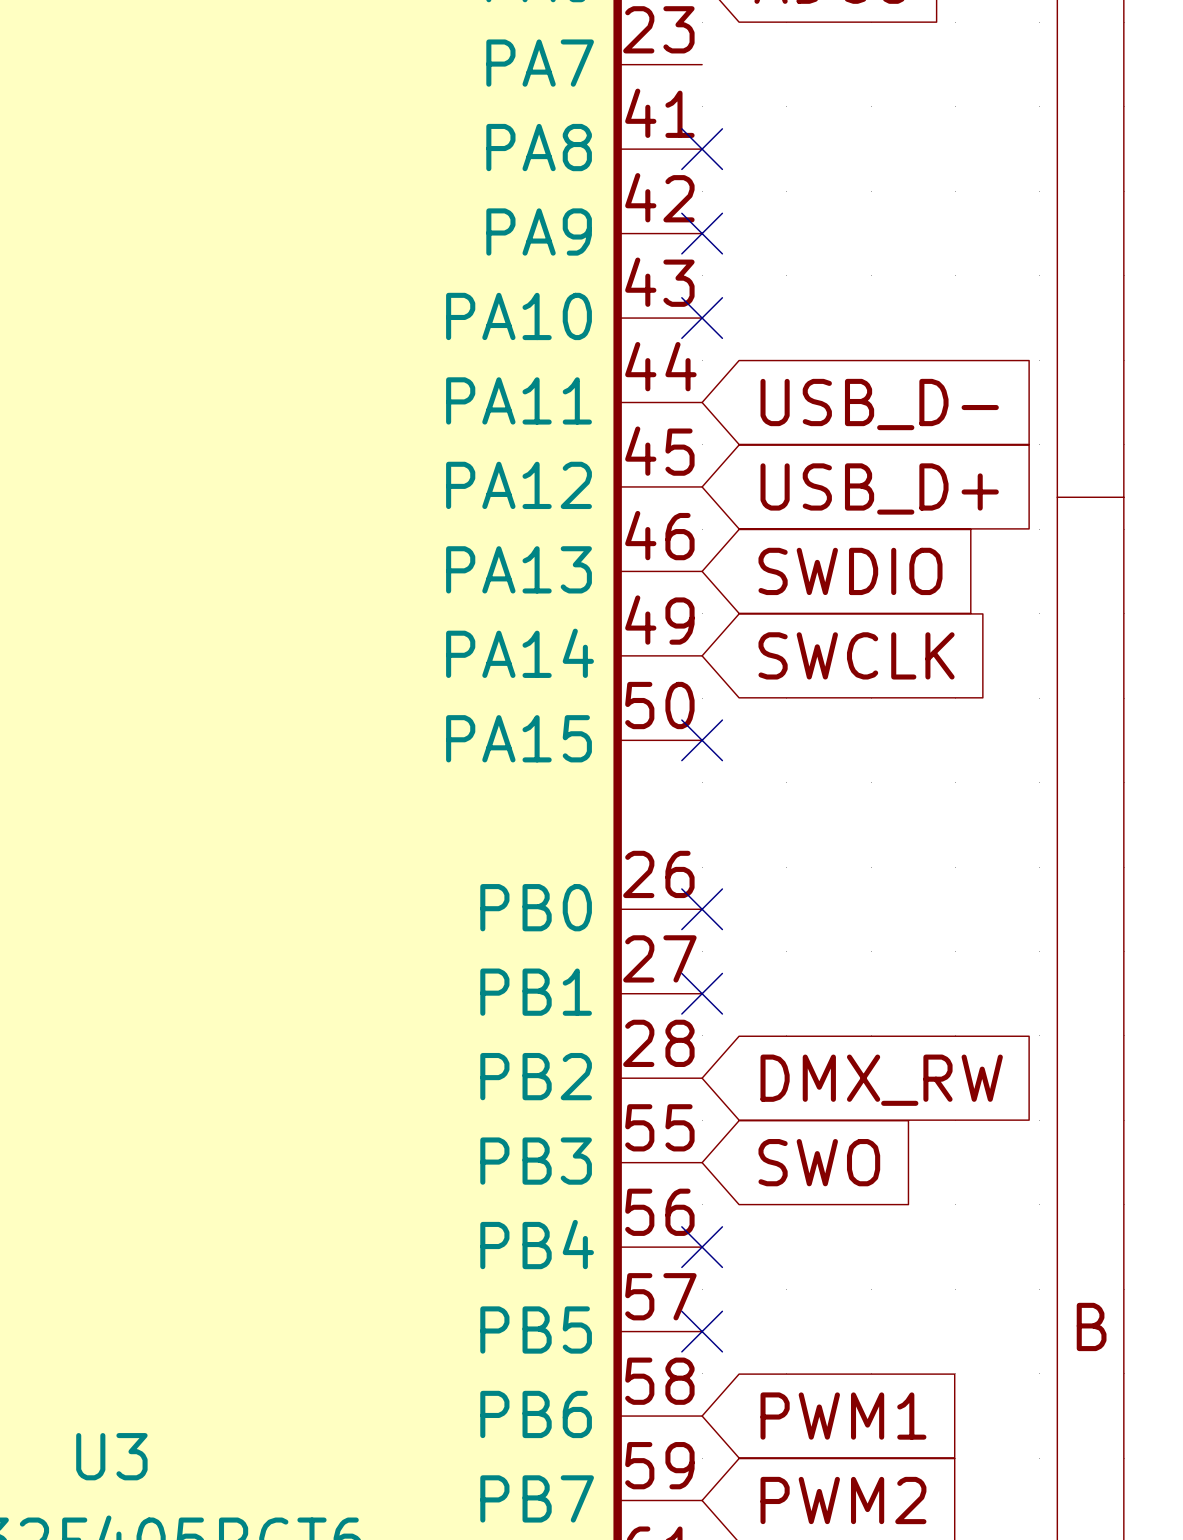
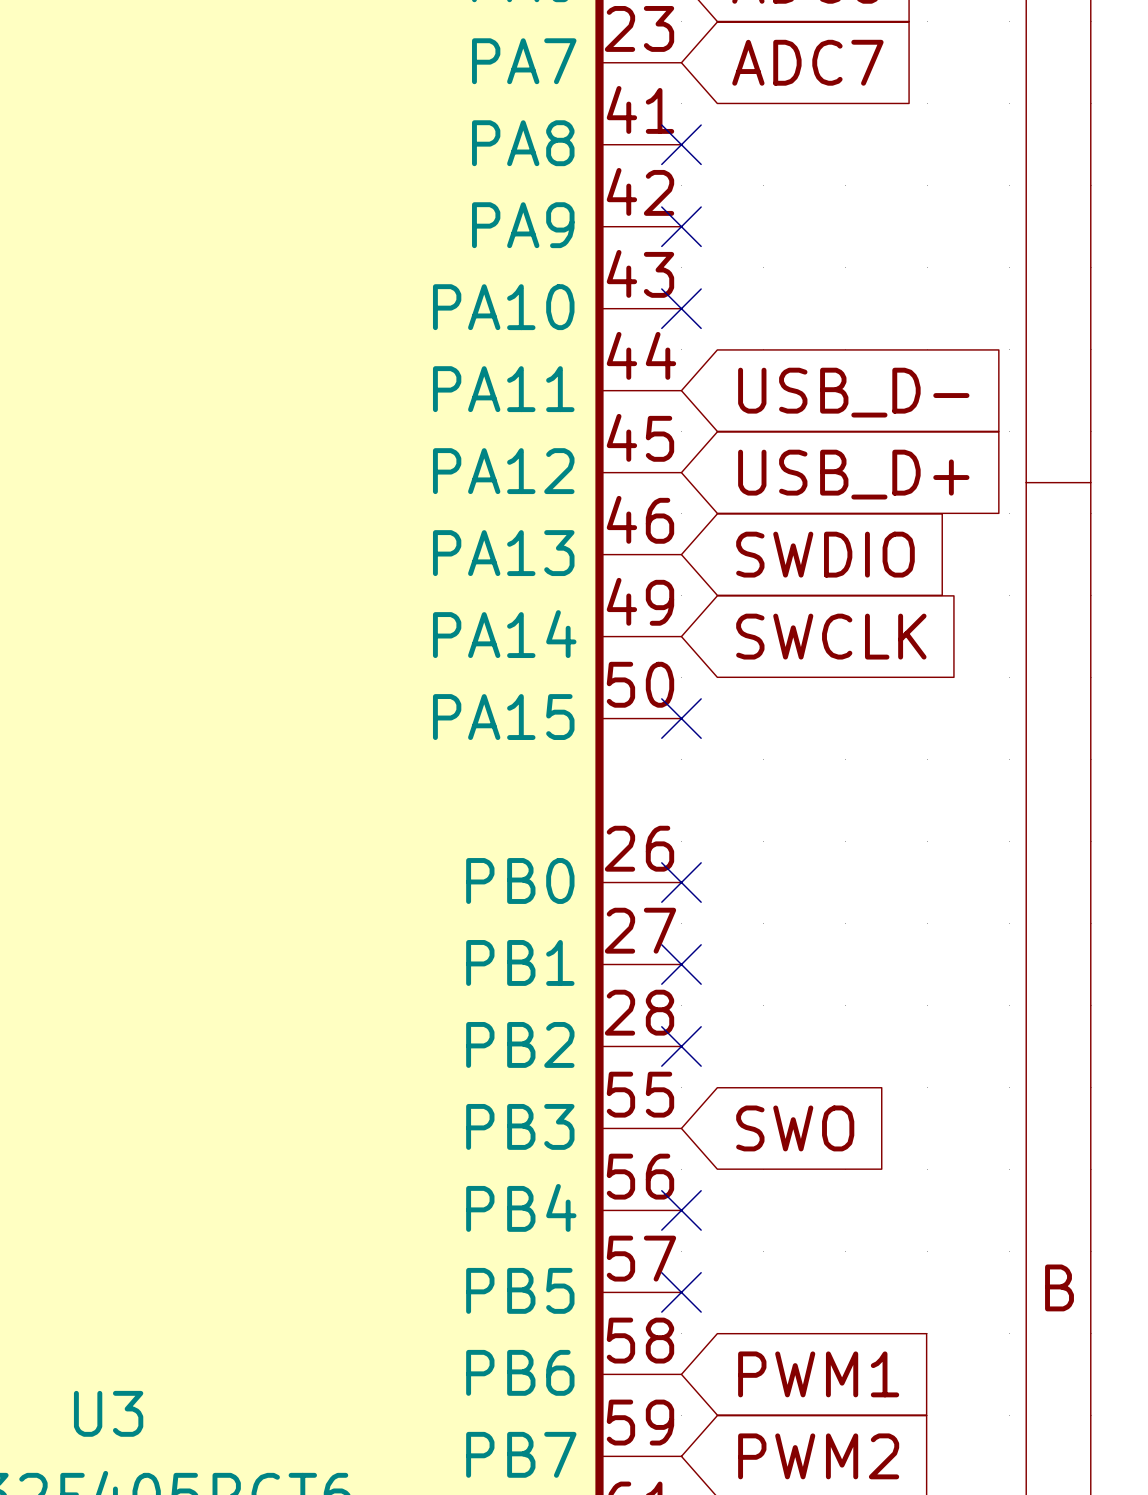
global label: none -> ADC7 (807, 62)
no-connect mark: none -> (681, 1046)
global label: DMX_RW (881, 1080) -> none

